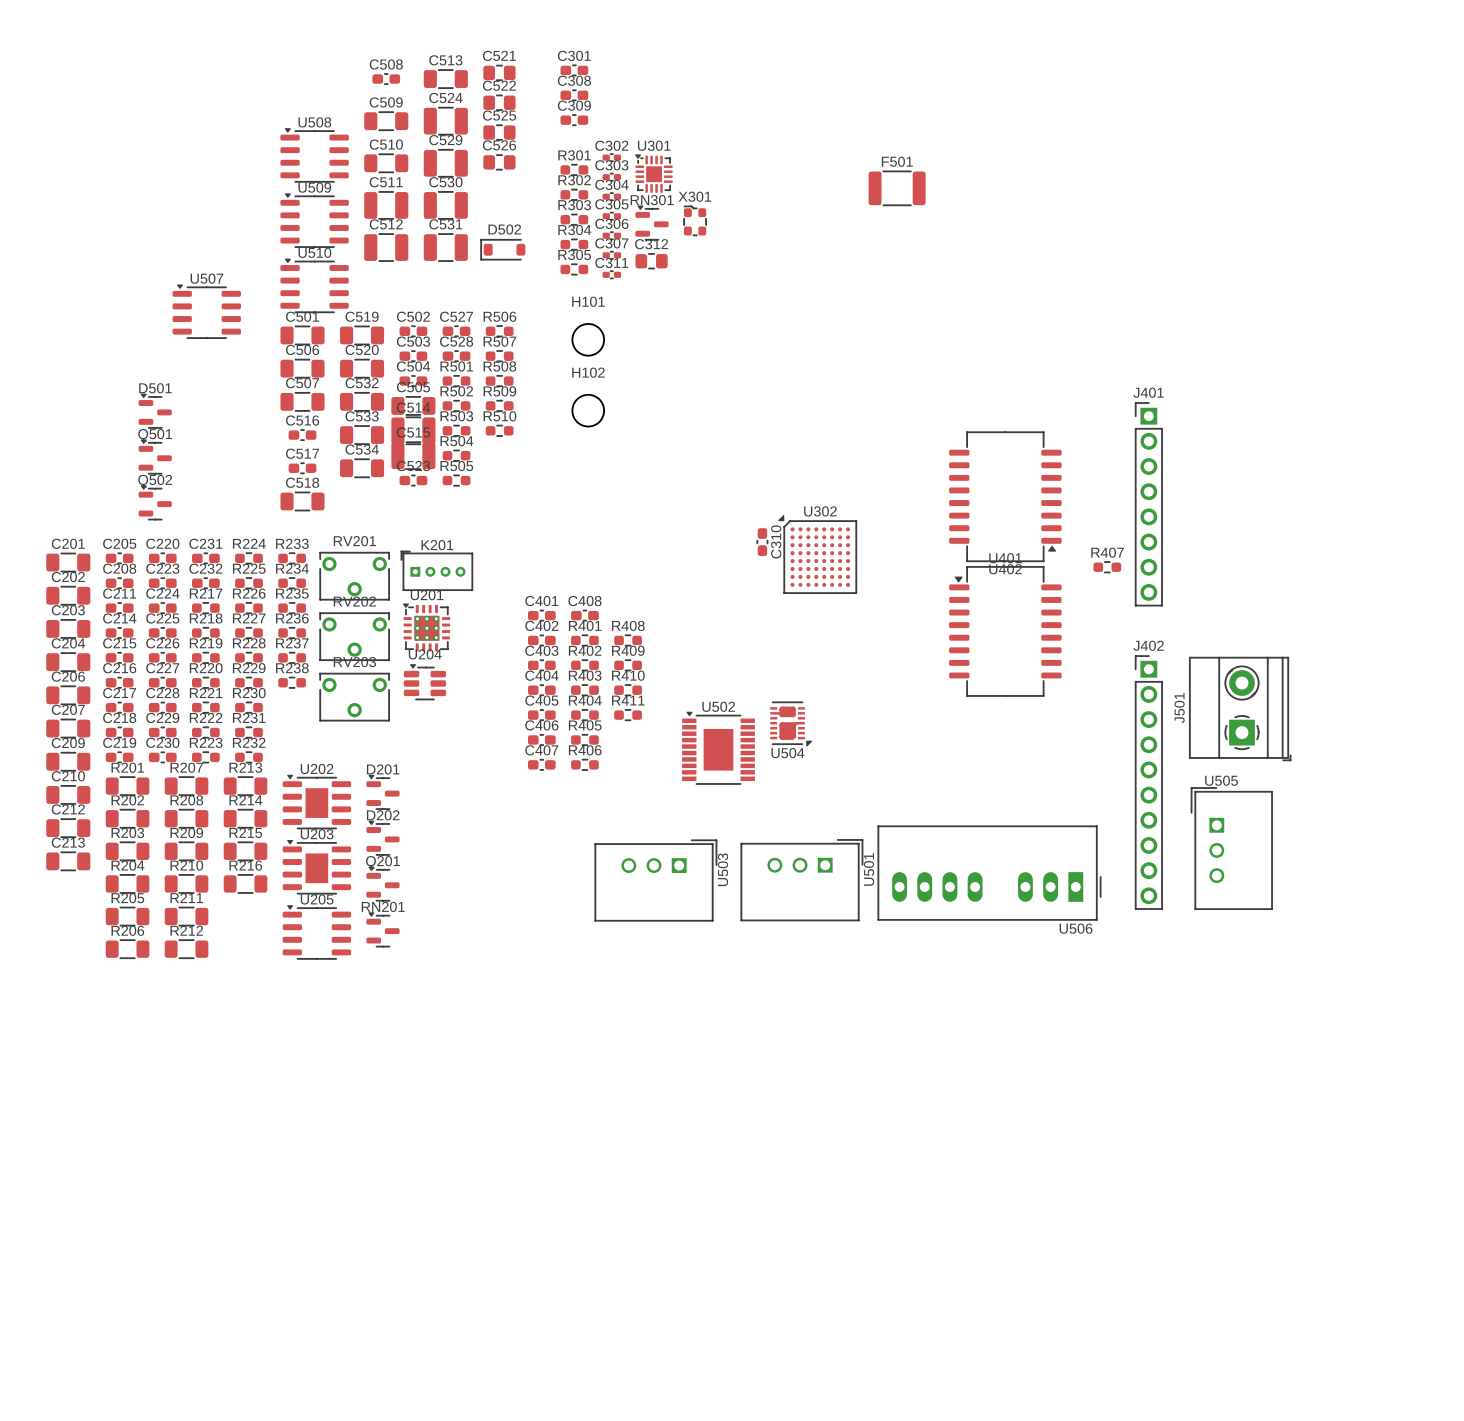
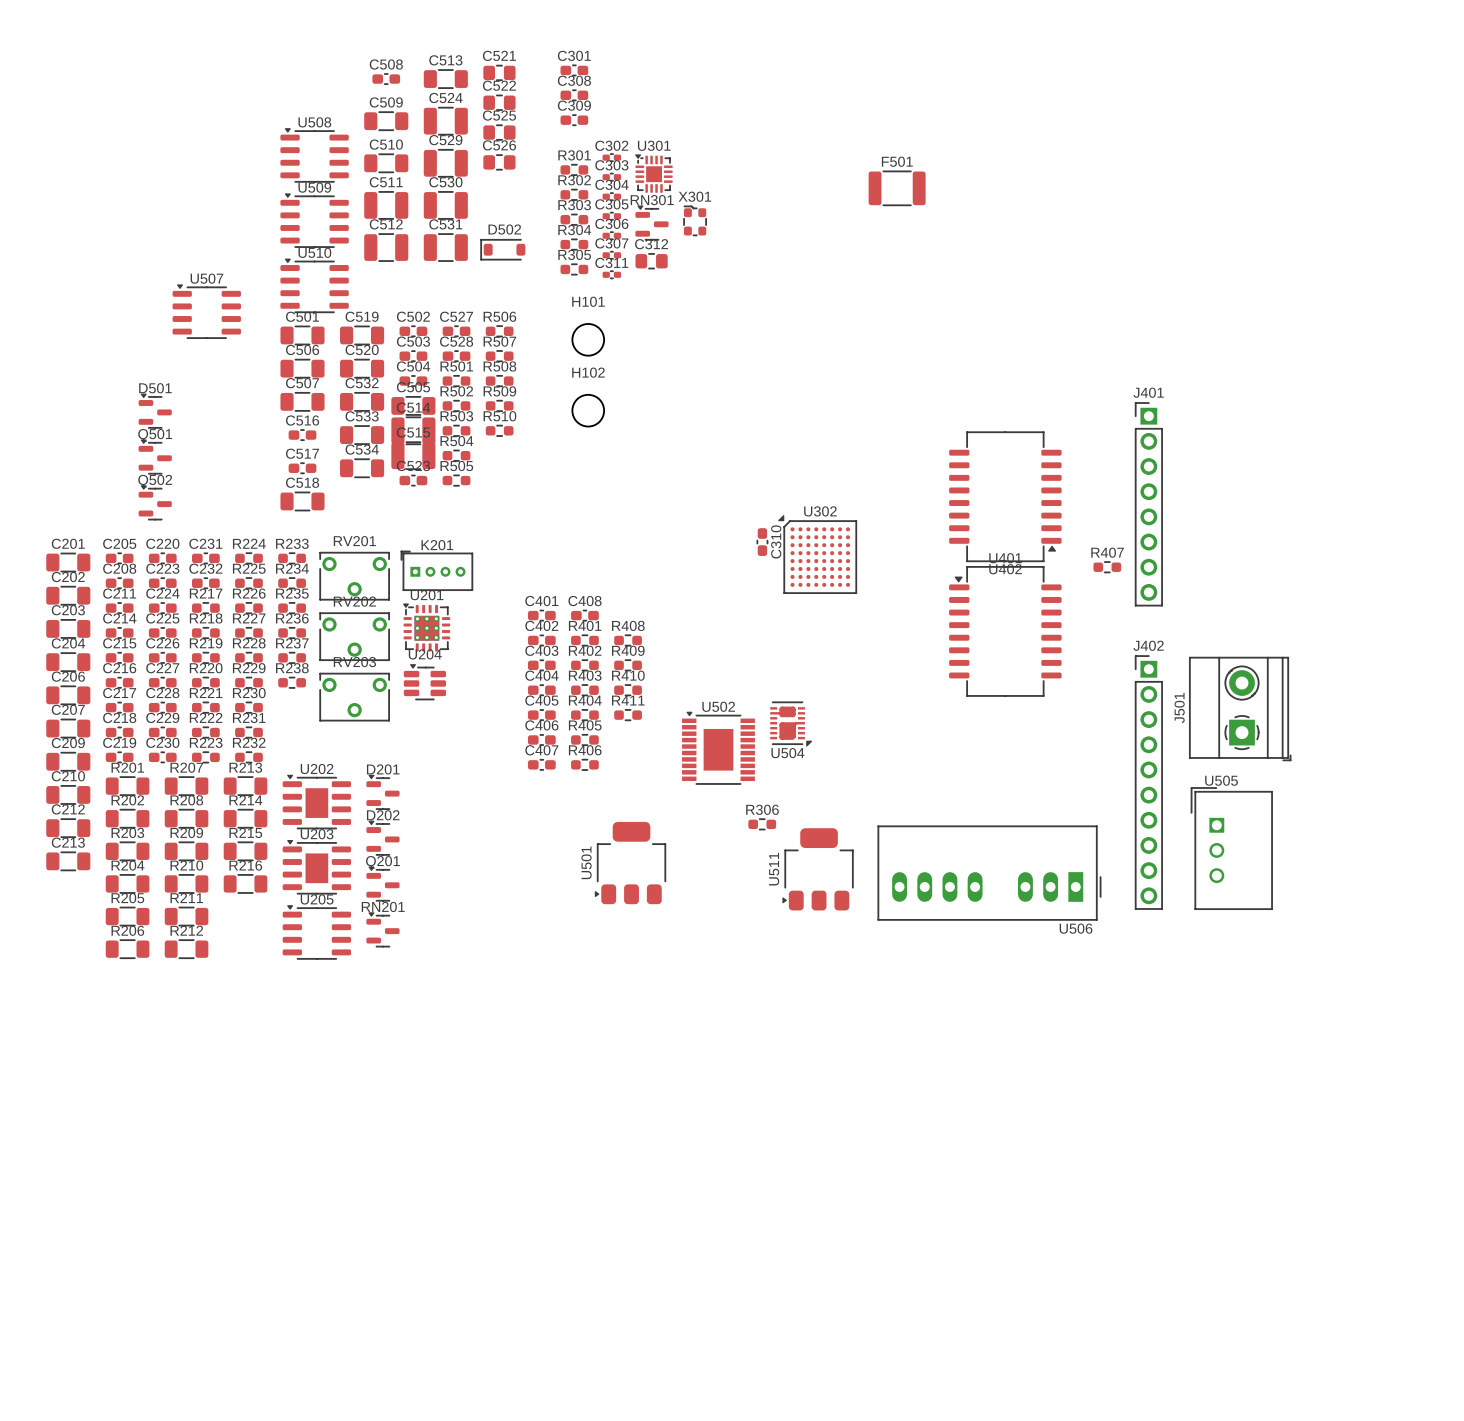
R306: none -> (762, 824)
U501 footprint: [740, 839, 864, 922] -> [594, 821, 666, 905]
U511: none -> (817, 869)
U501 name position: U501 (869, 869) -> U501 (586, 862)
U503: (655, 880) -> none

